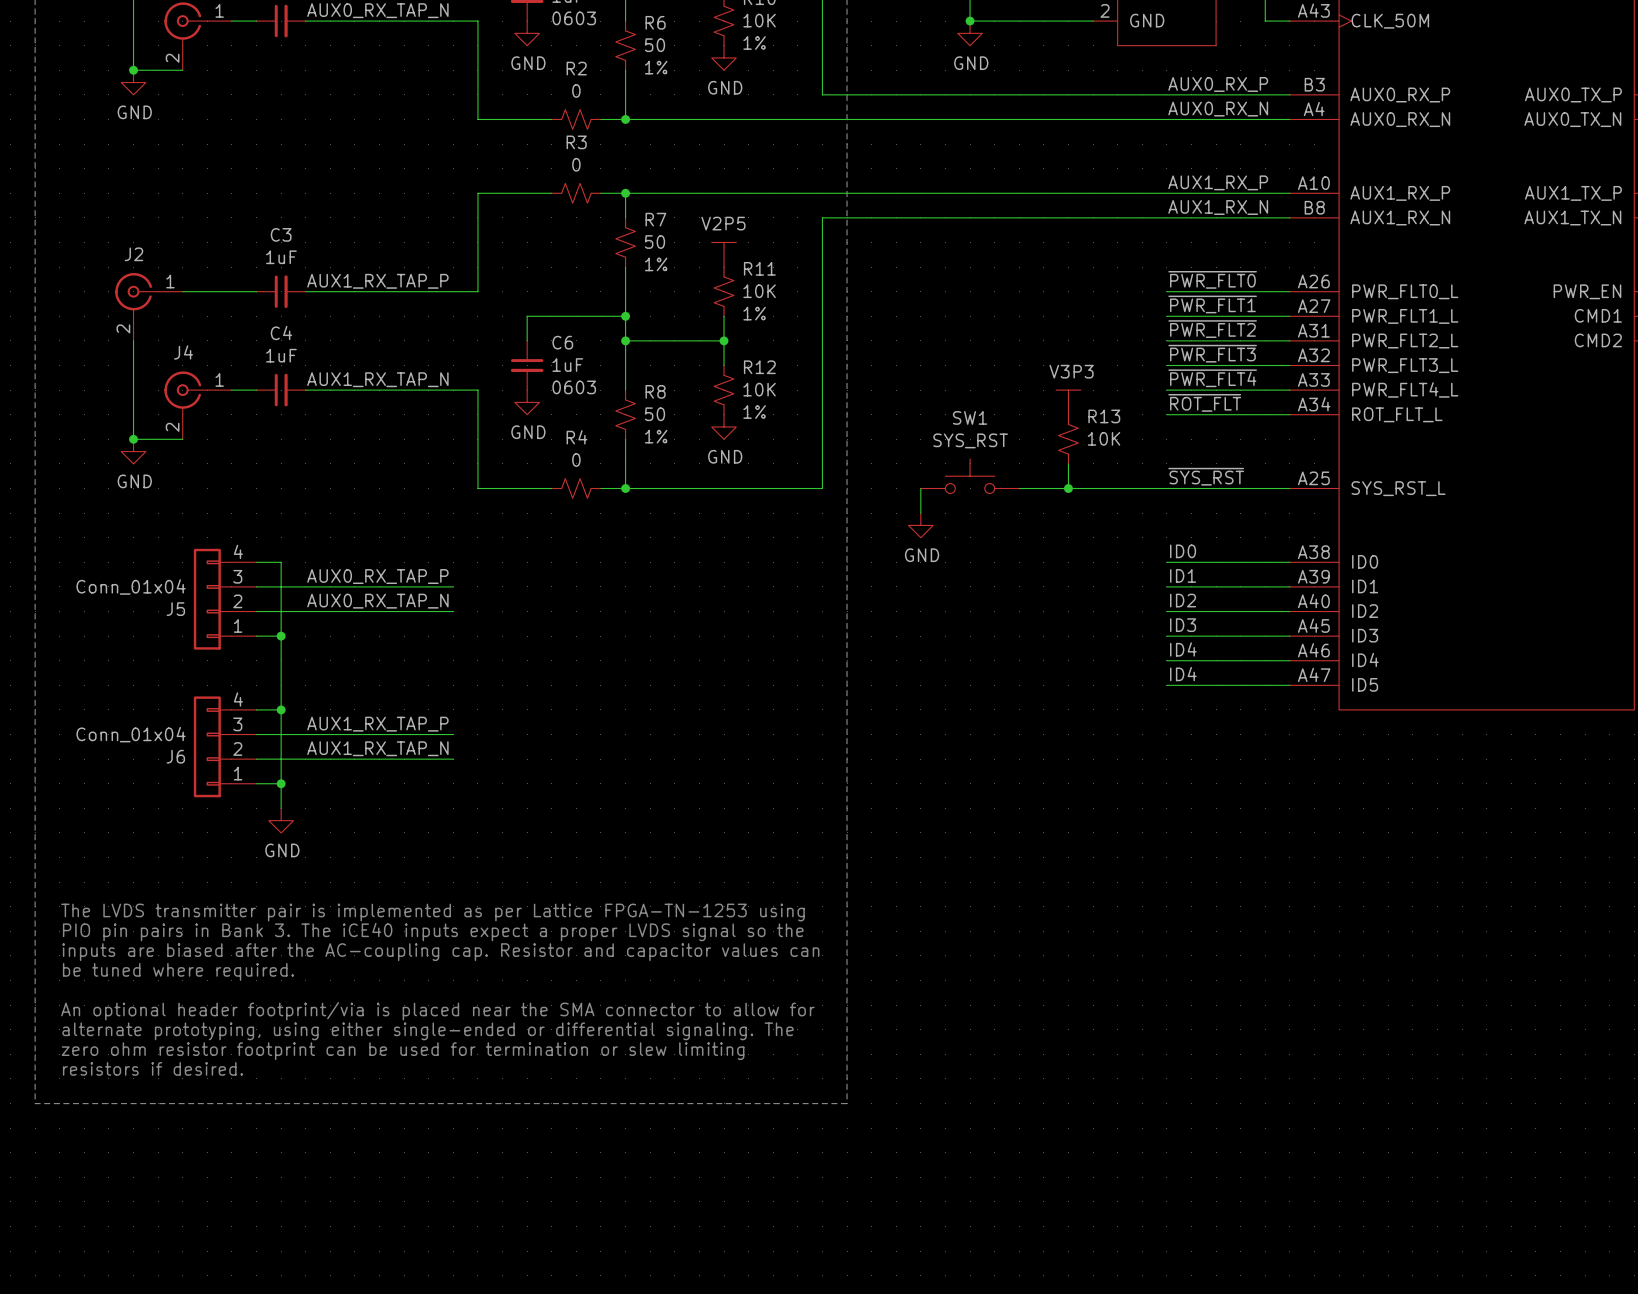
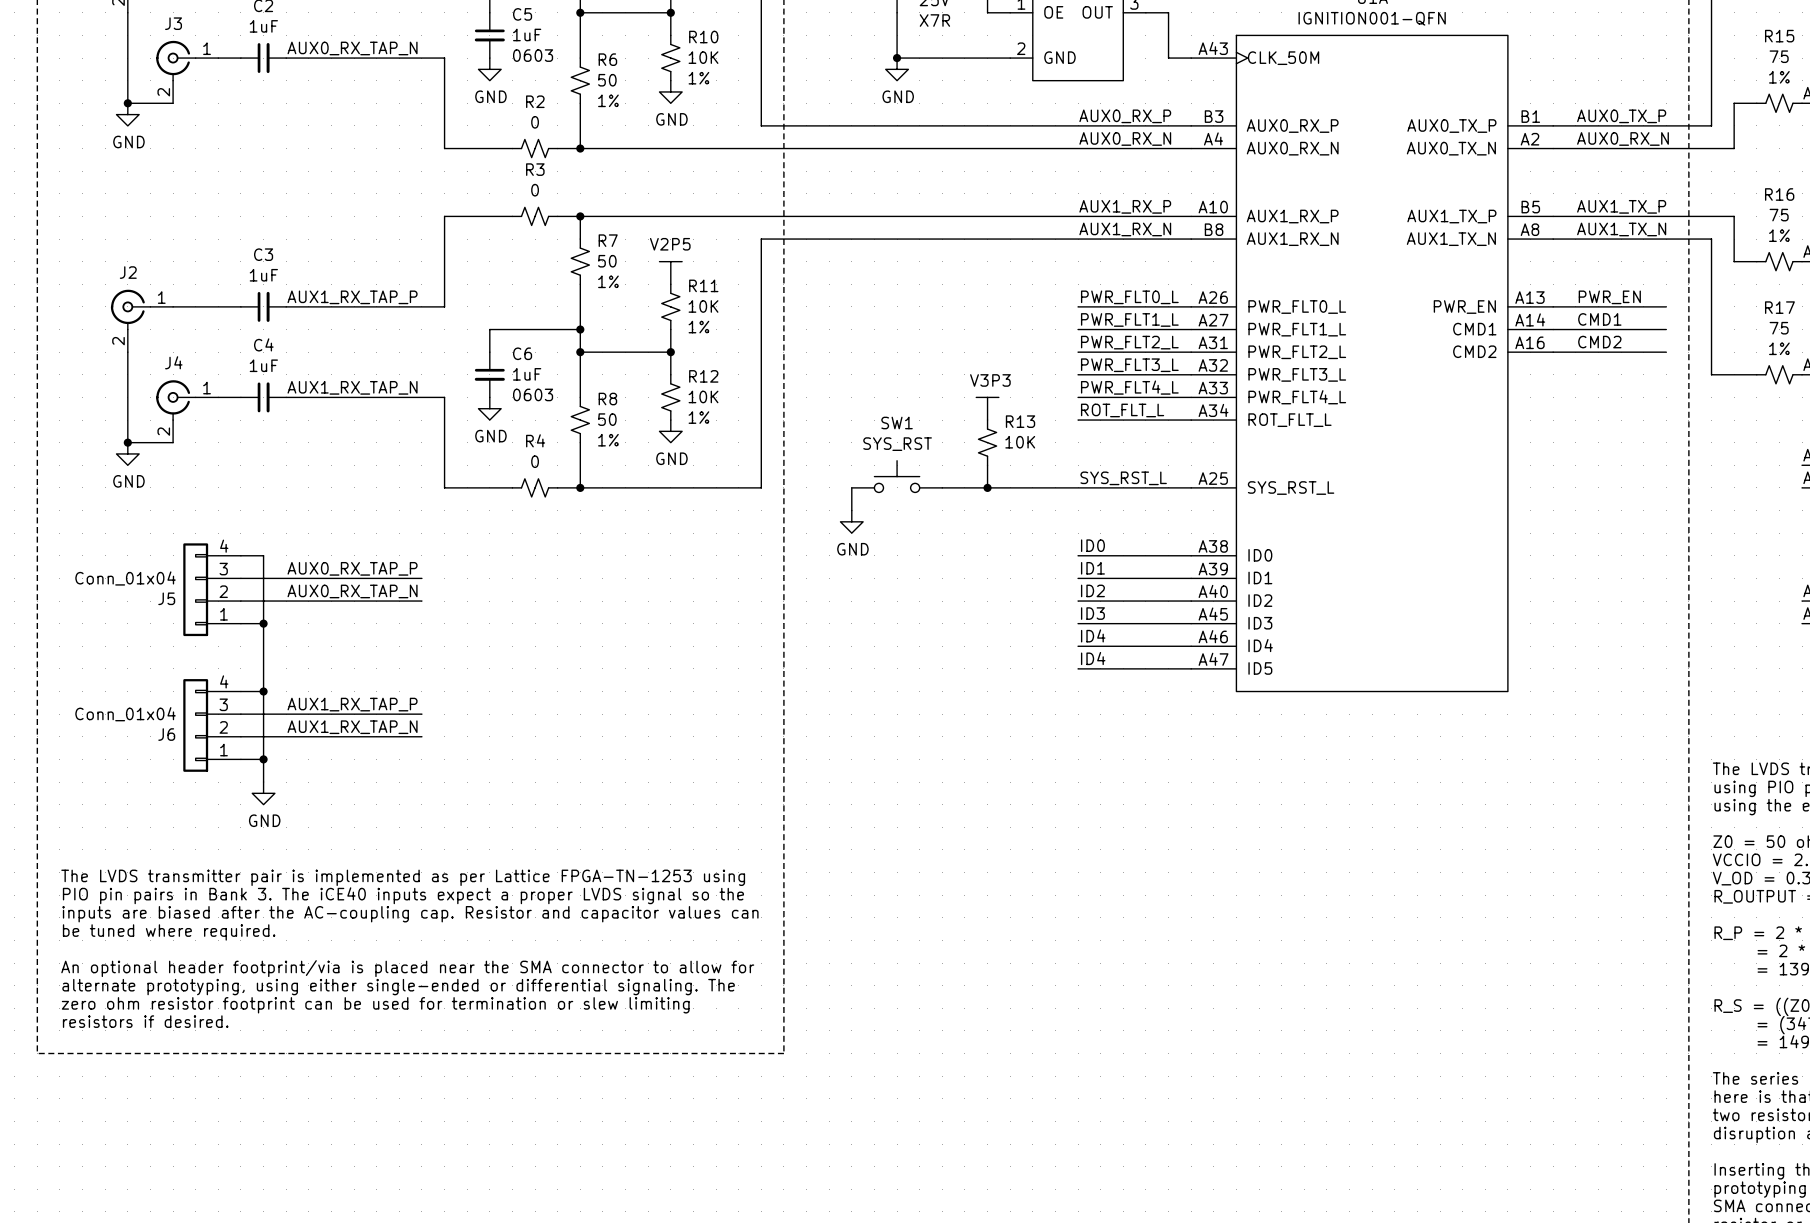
label: ~{PWR_FLT0} (1212, 279) -> PWR_FLT0_L (1129, 297)
label: ~{PWR_FLT1} (1212, 304) -> PWR_FLT1_L (1129, 319)
label: ~{PWR_FLT2} (1212, 329) -> PWR_FLT2_L (1129, 342)
label: ~{PWR_FLT3} (1212, 353) -> PWR_FLT3_L (1129, 365)
label: ~{PWR_FLT4} (1212, 378) -> PWR_FLT4_L (1129, 387)
label: ~{ROT_FLT} (1204, 402) -> ROT_FLT_L (1122, 410)
label: ~{SYS_RST} (1206, 476) -> SYS_RST_L (1123, 478)

